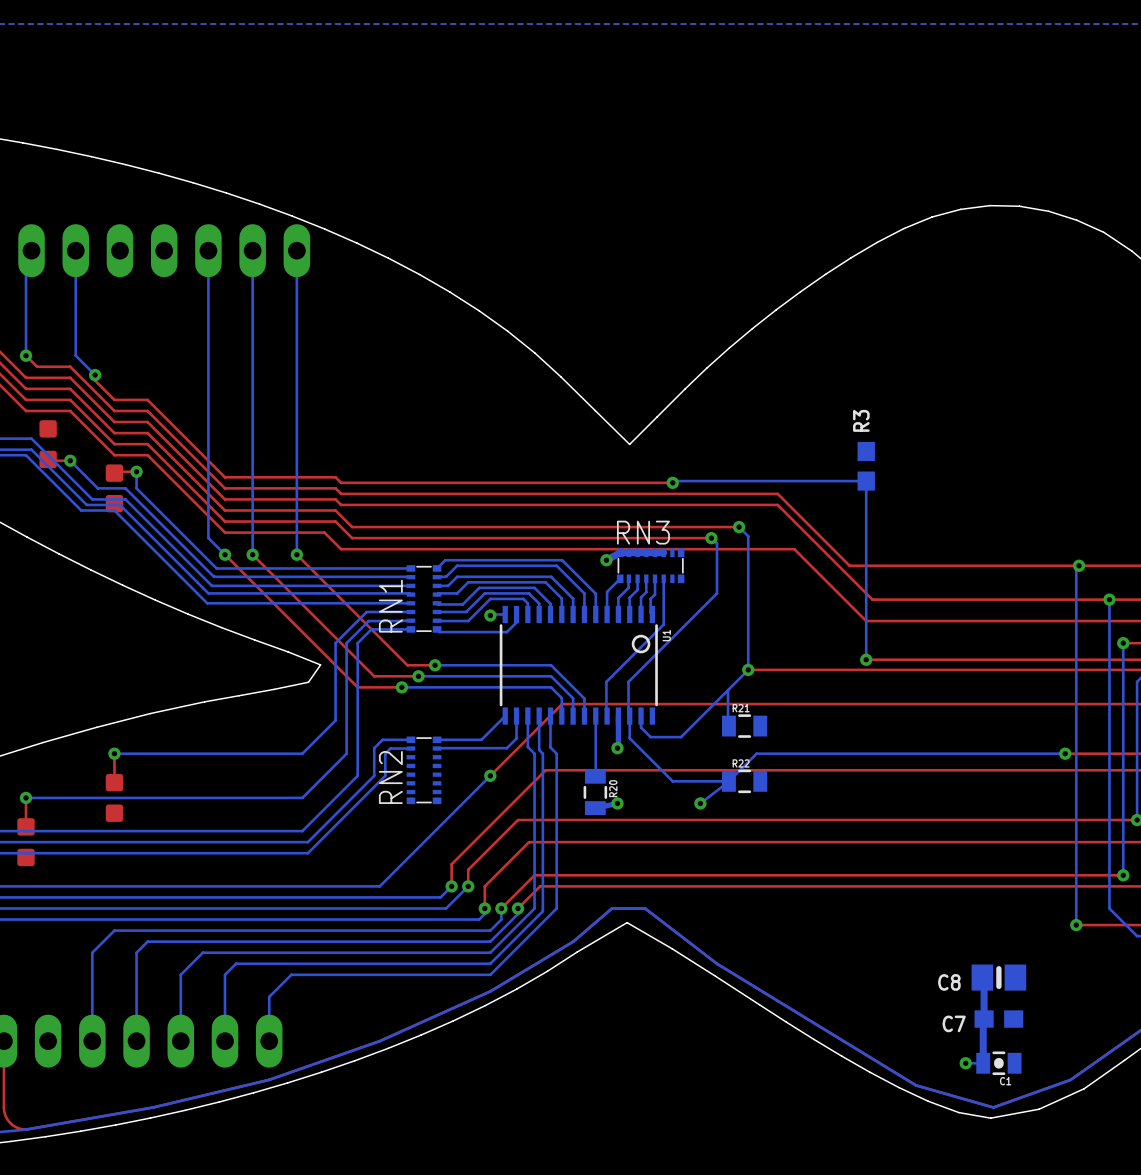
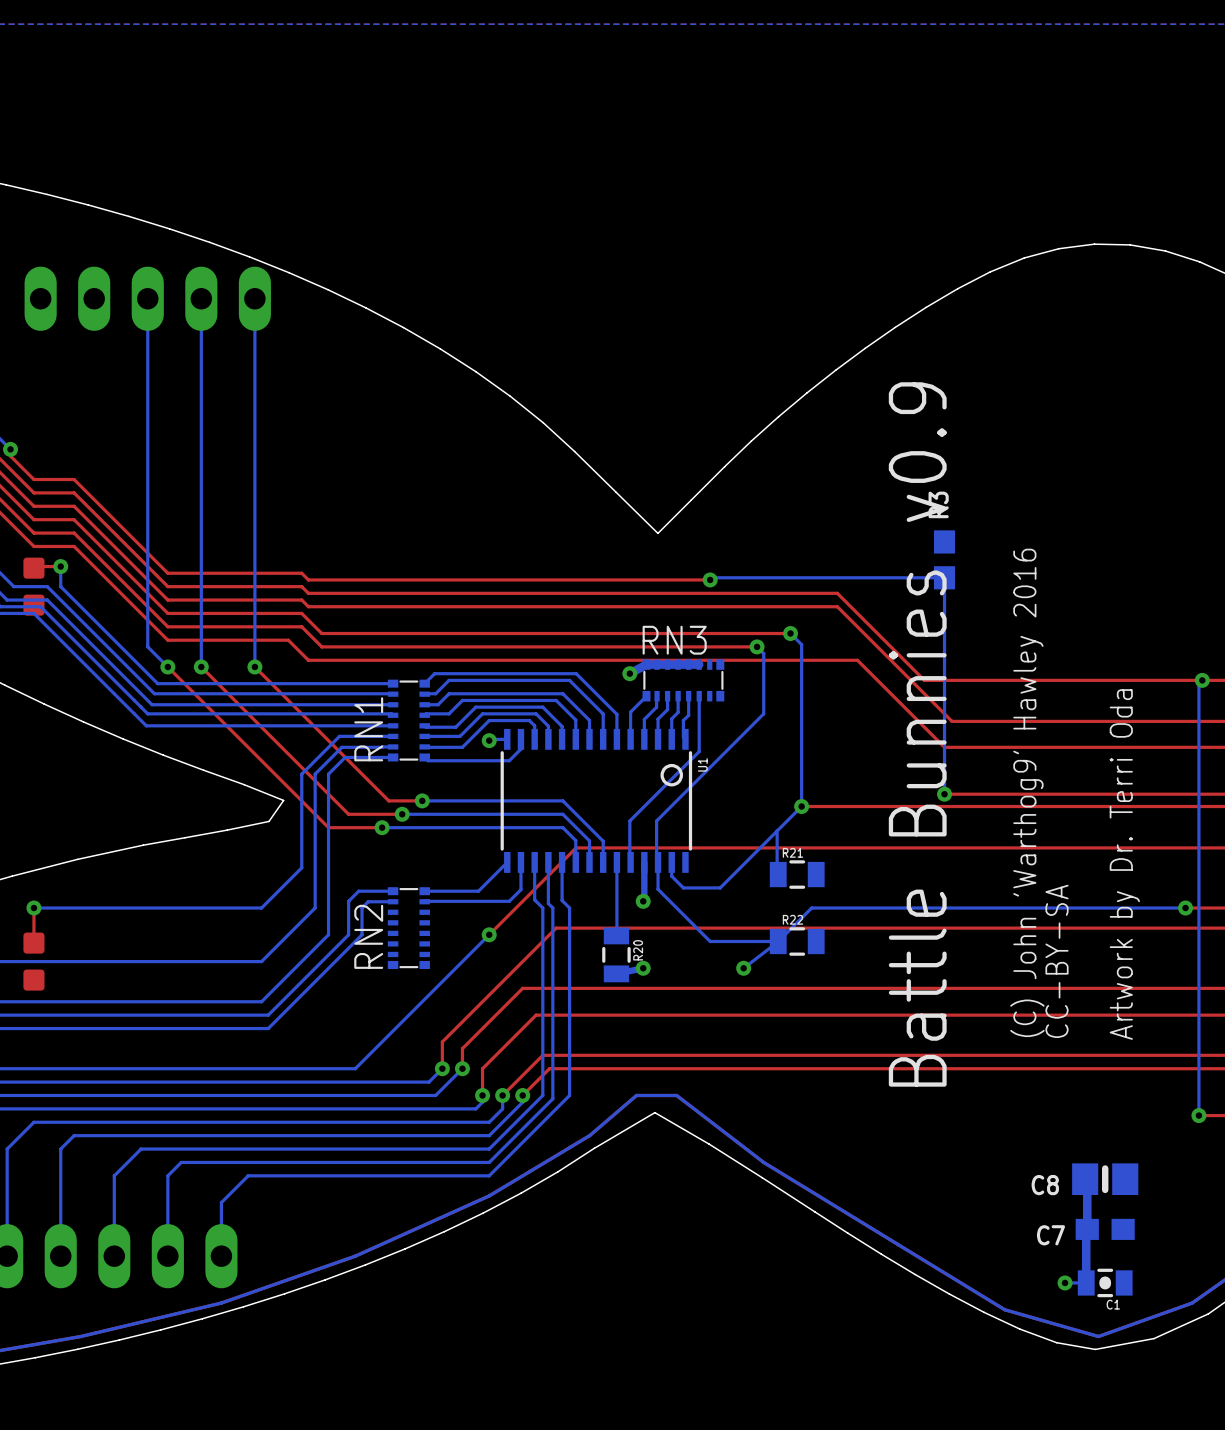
text: none -> Battle Bunnies v0.9 (917, 734)
text: none -> (C) John 'Warthog9' Hawley 2016 (1027, 792)
text: none -> Artwork by Dr. Terri Oda (1124, 864)
text: none -> CC-BY-SA (1057, 961)

